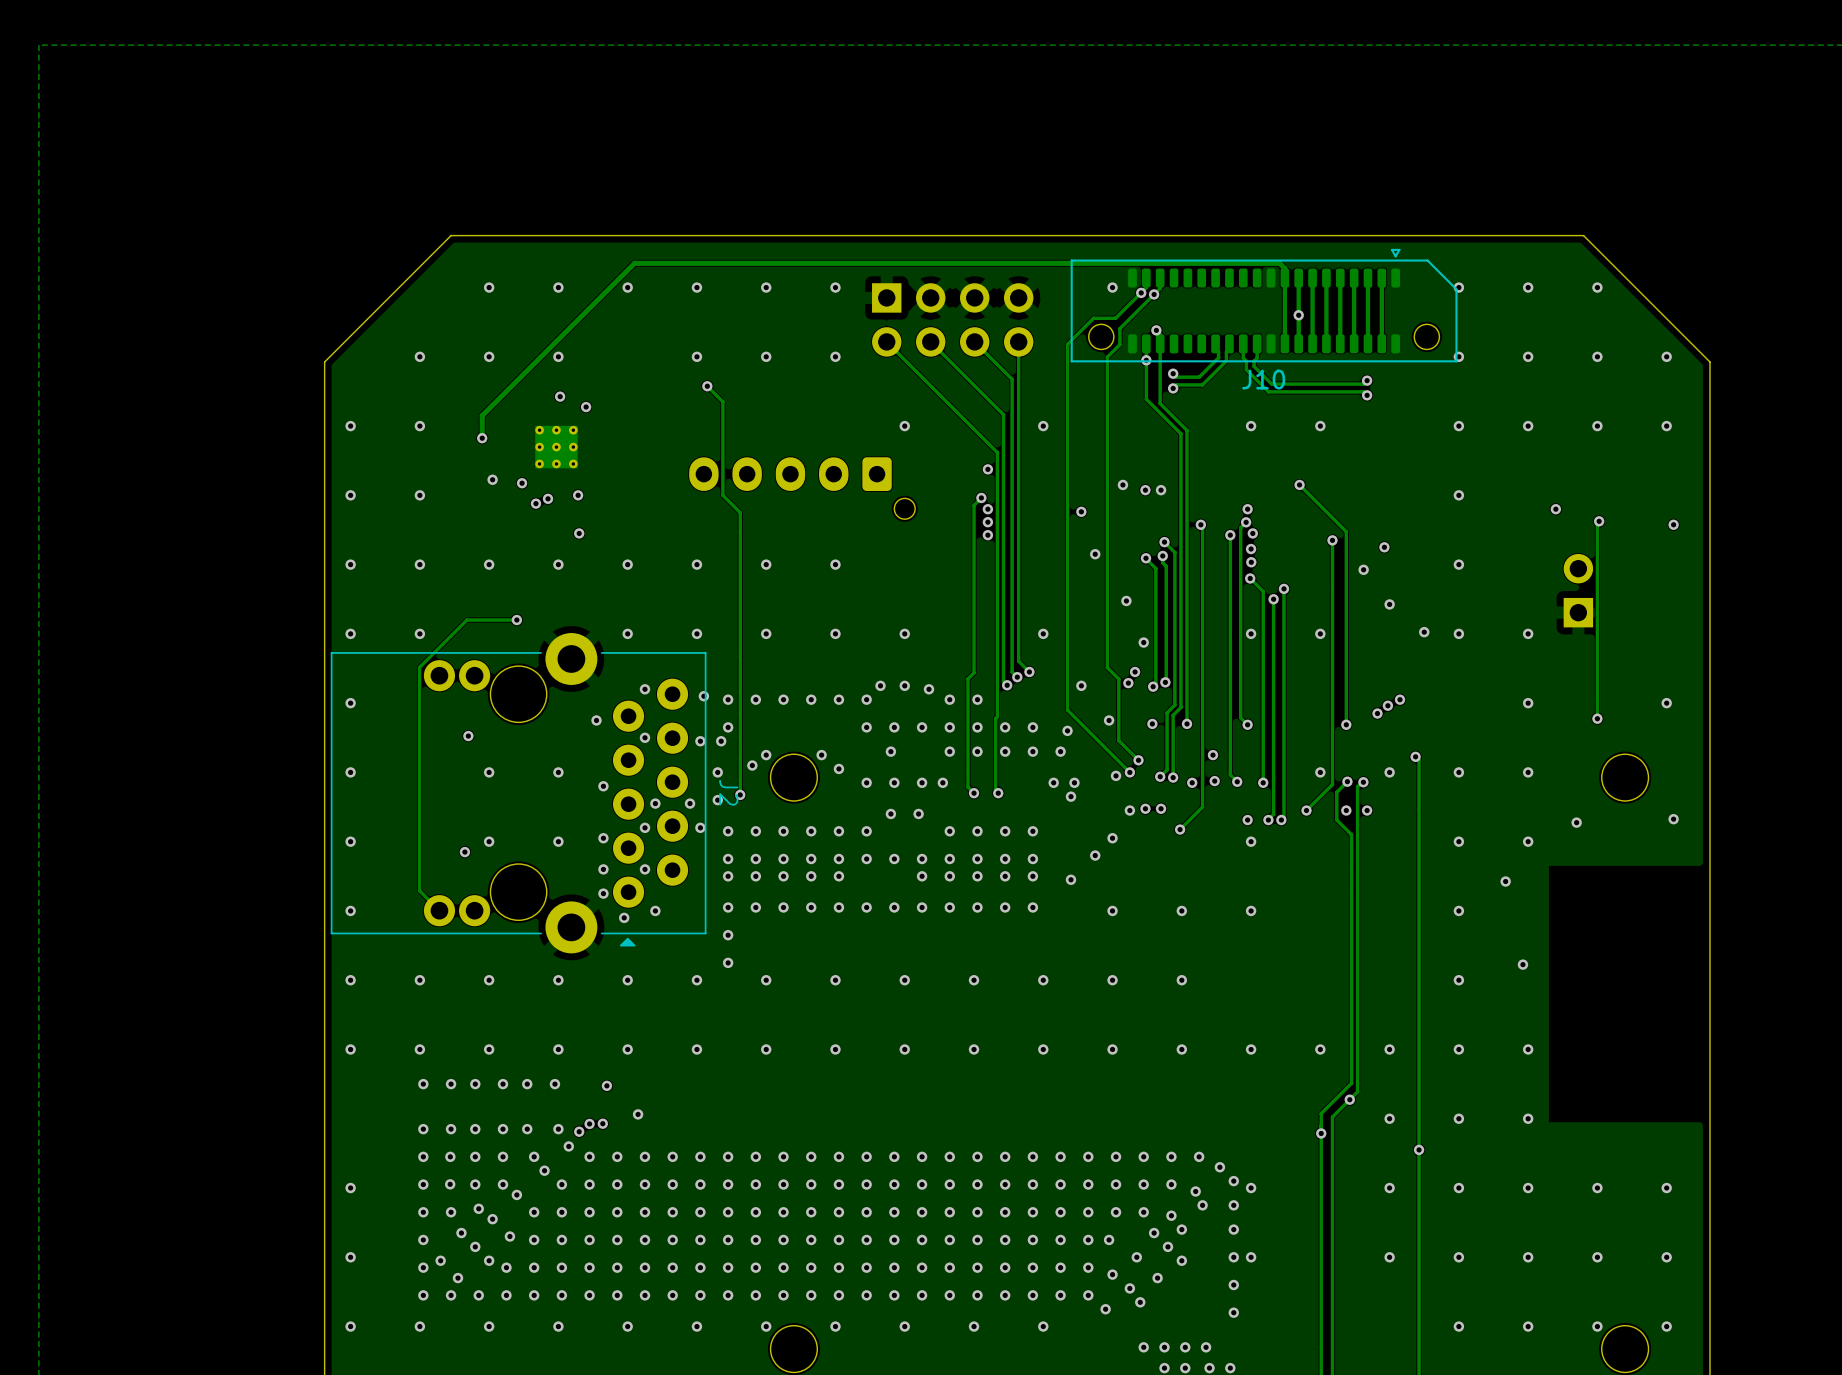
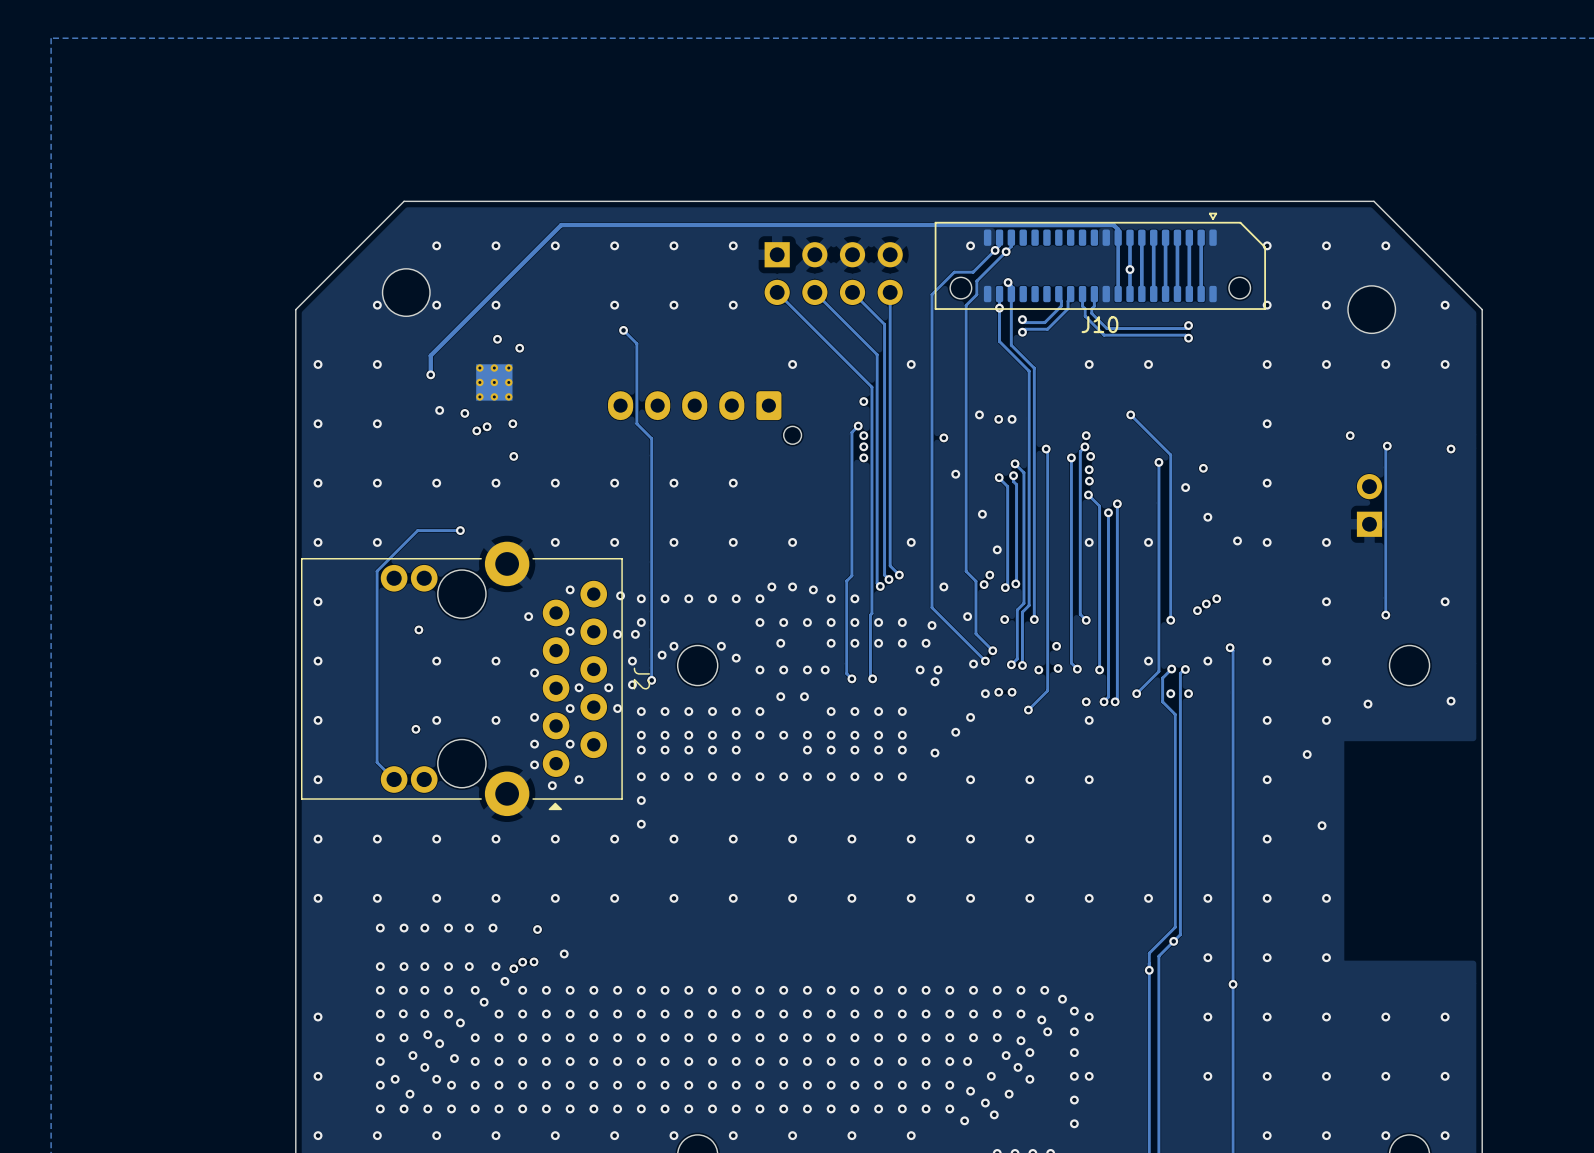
part: none -> (406, 292)
via: (1597, 356) -> none
part: none -> (1371, 309)

